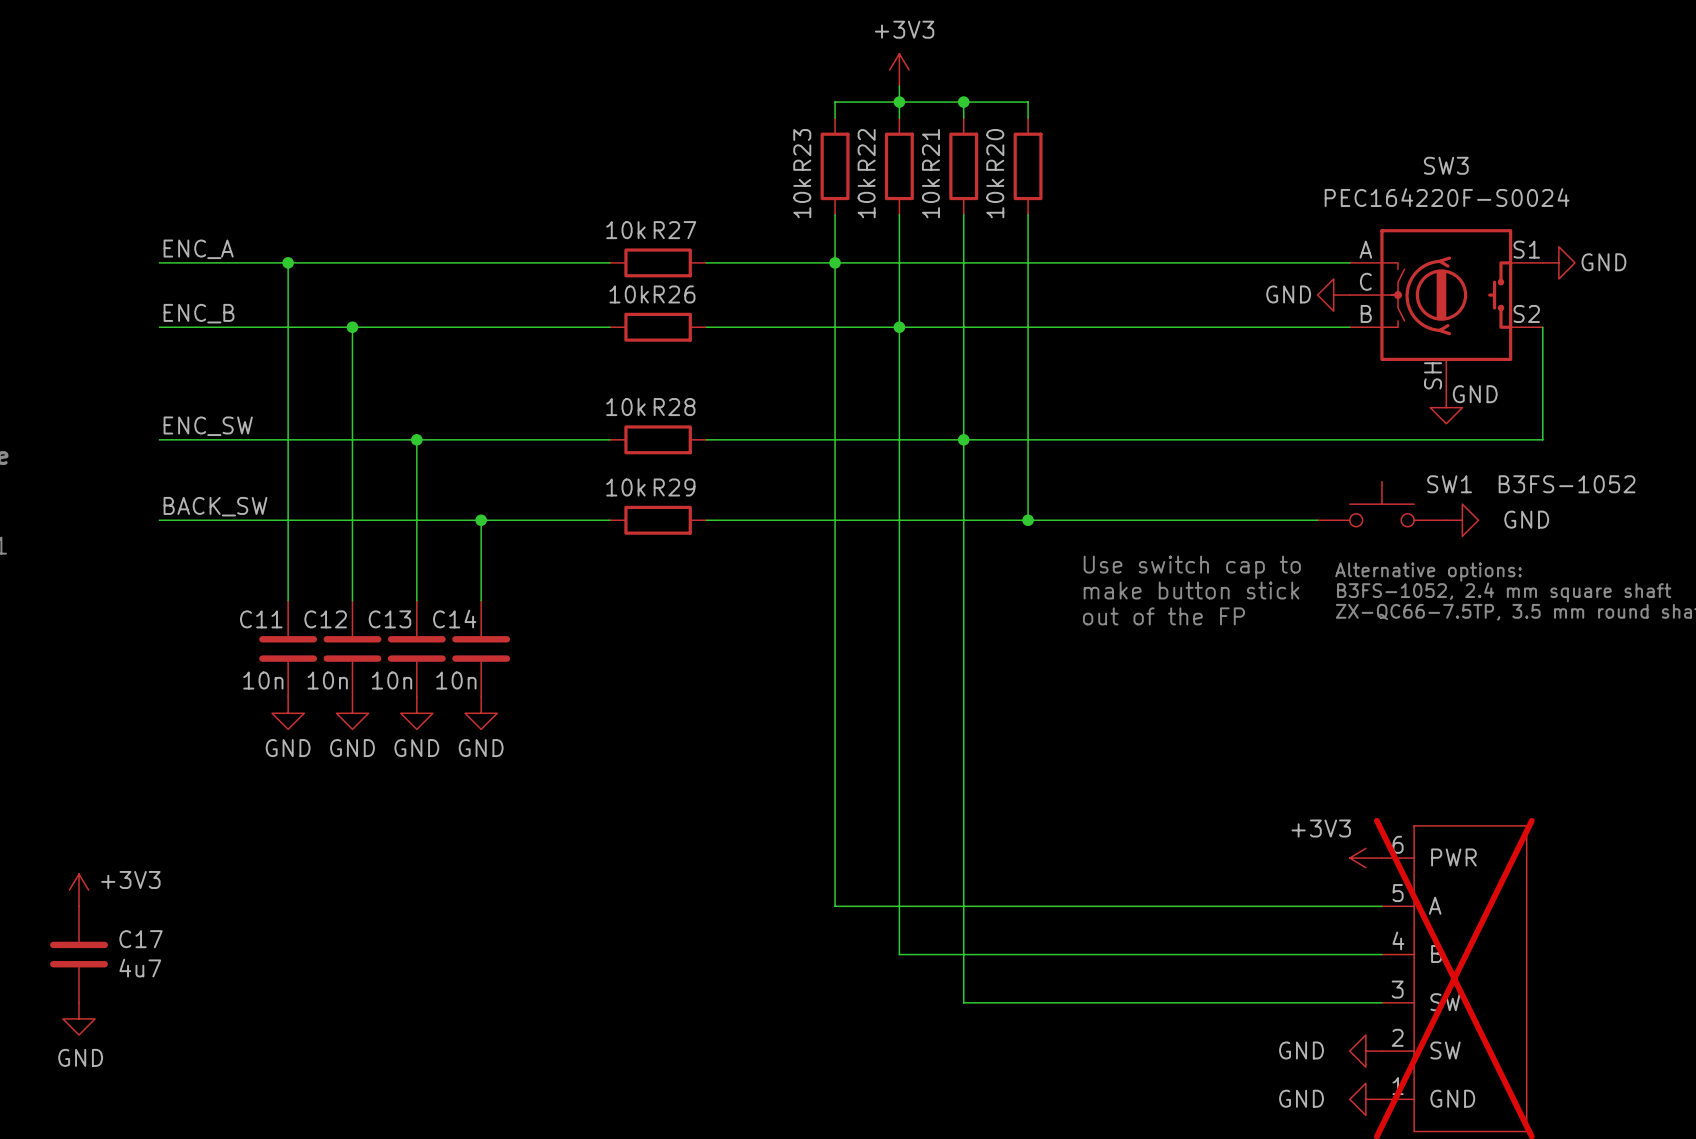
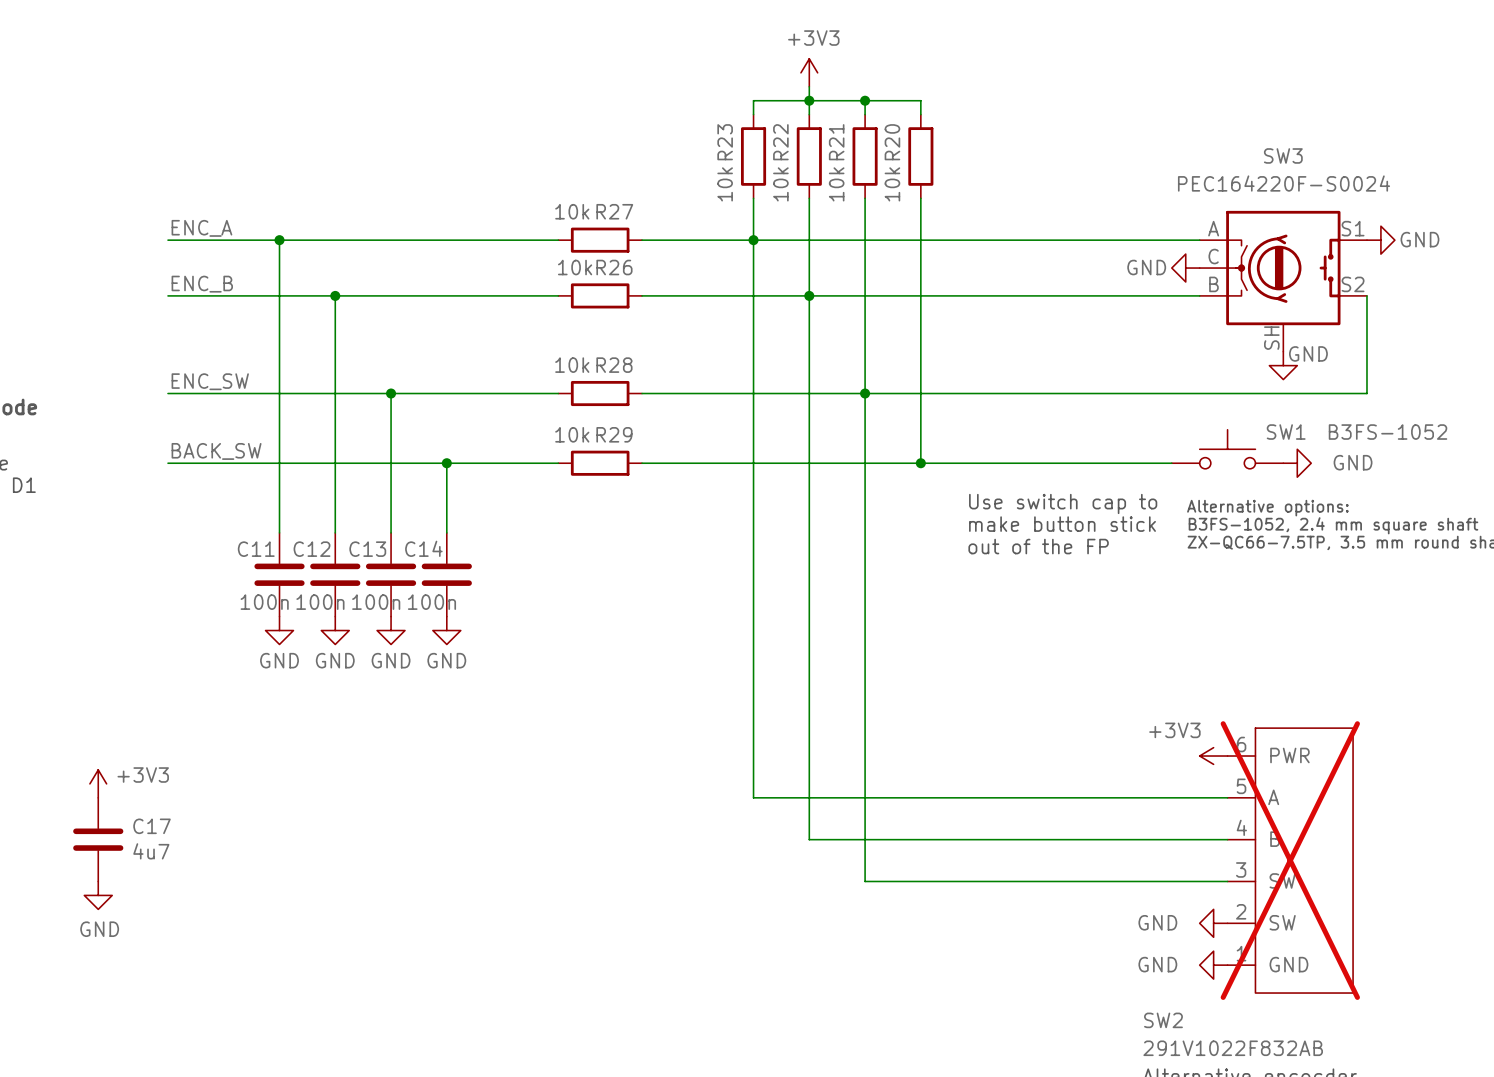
C11 value: 10n (263, 680) -> 100n (264, 602)
C12 value: 10n (327, 680) -> 100n (320, 602)
C13 value: 10n (392, 680) -> 100n (376, 602)
C14 value: 10n (456, 680) -> 100n (431, 602)

